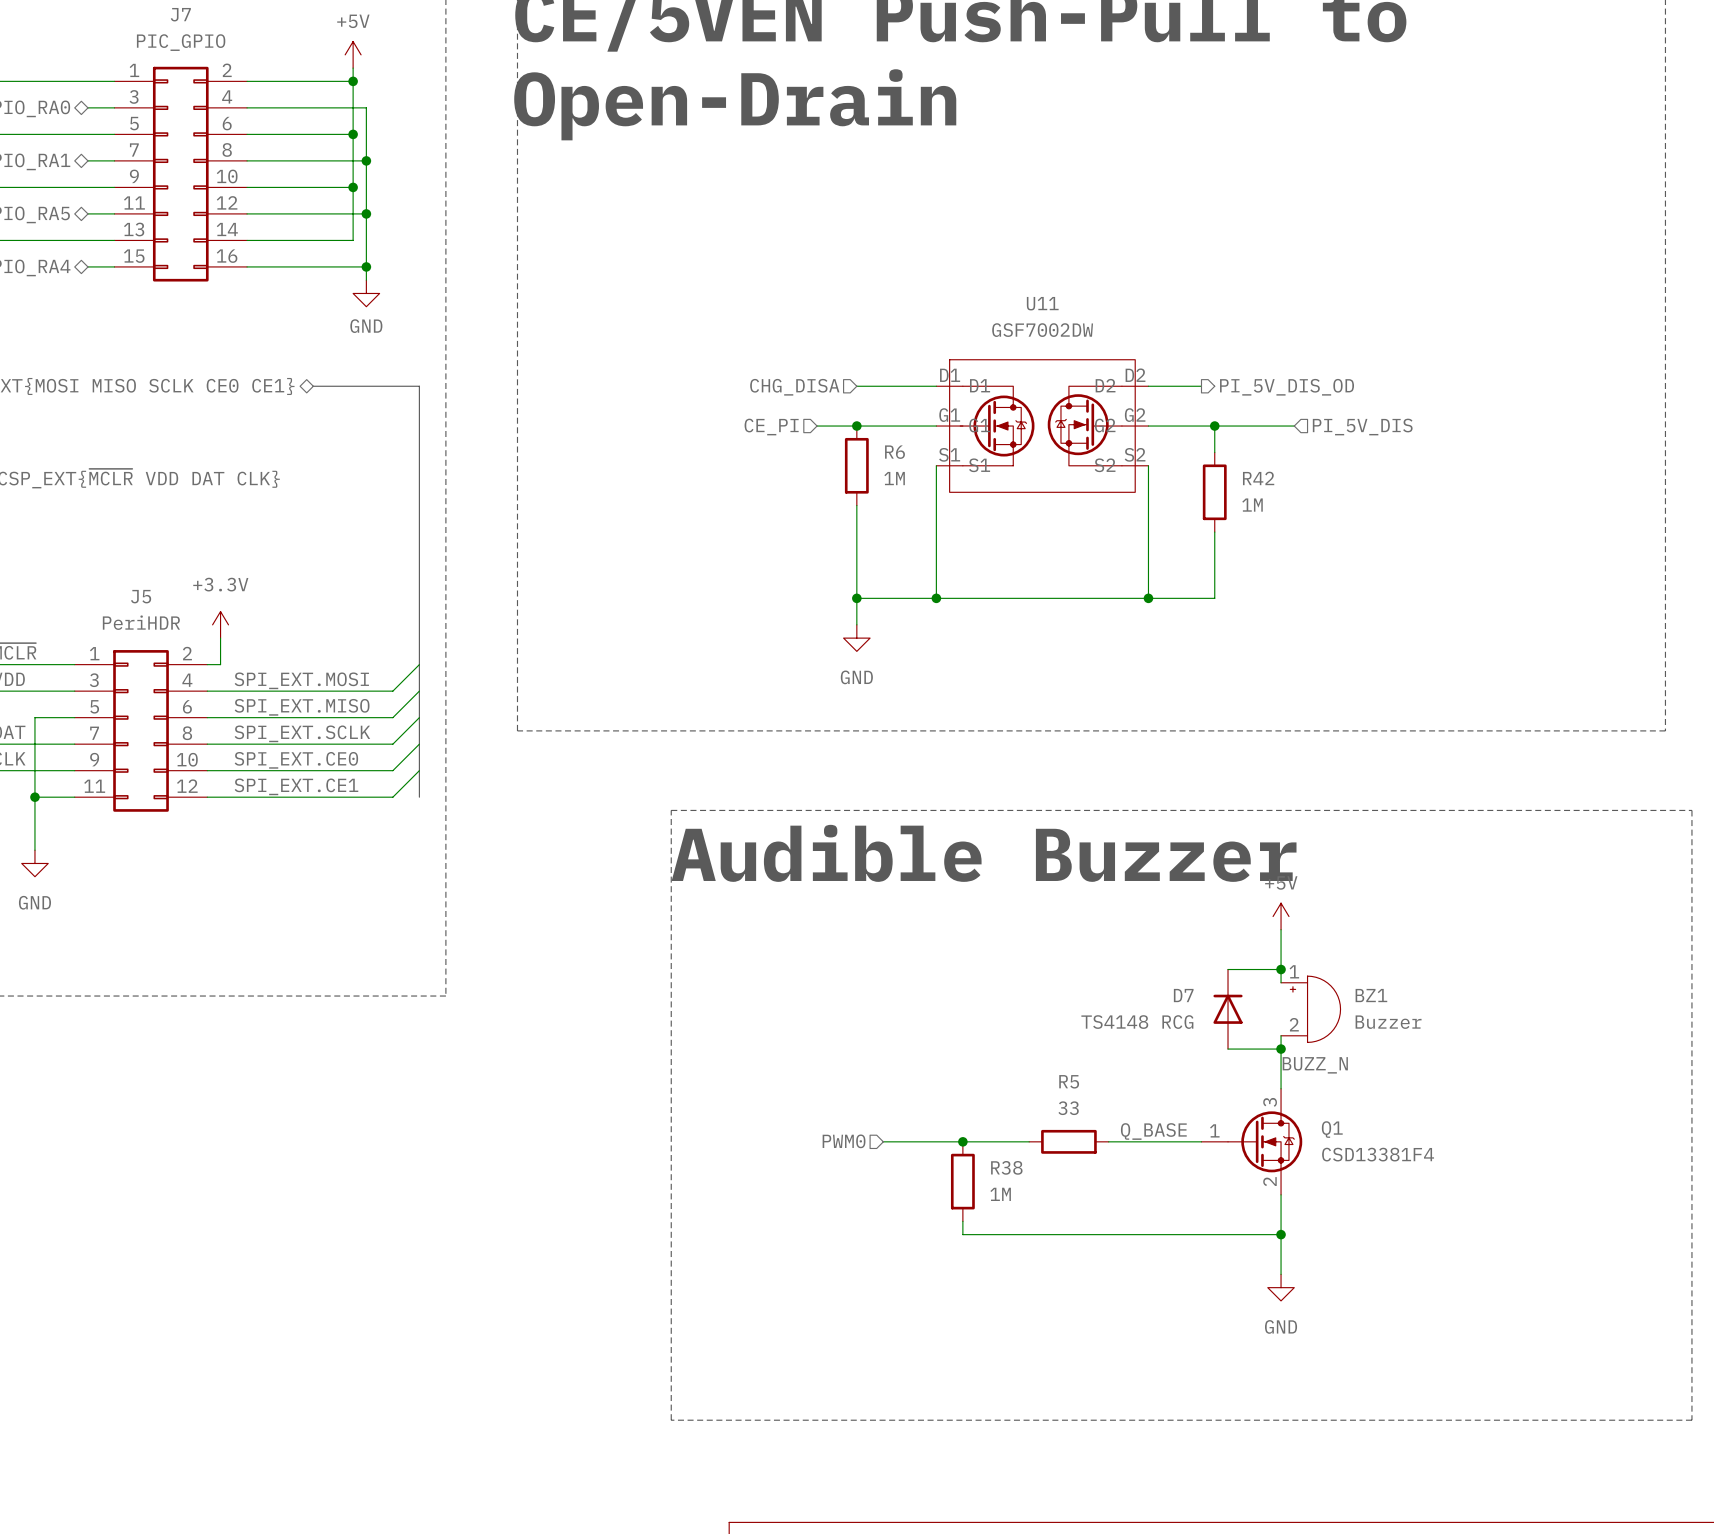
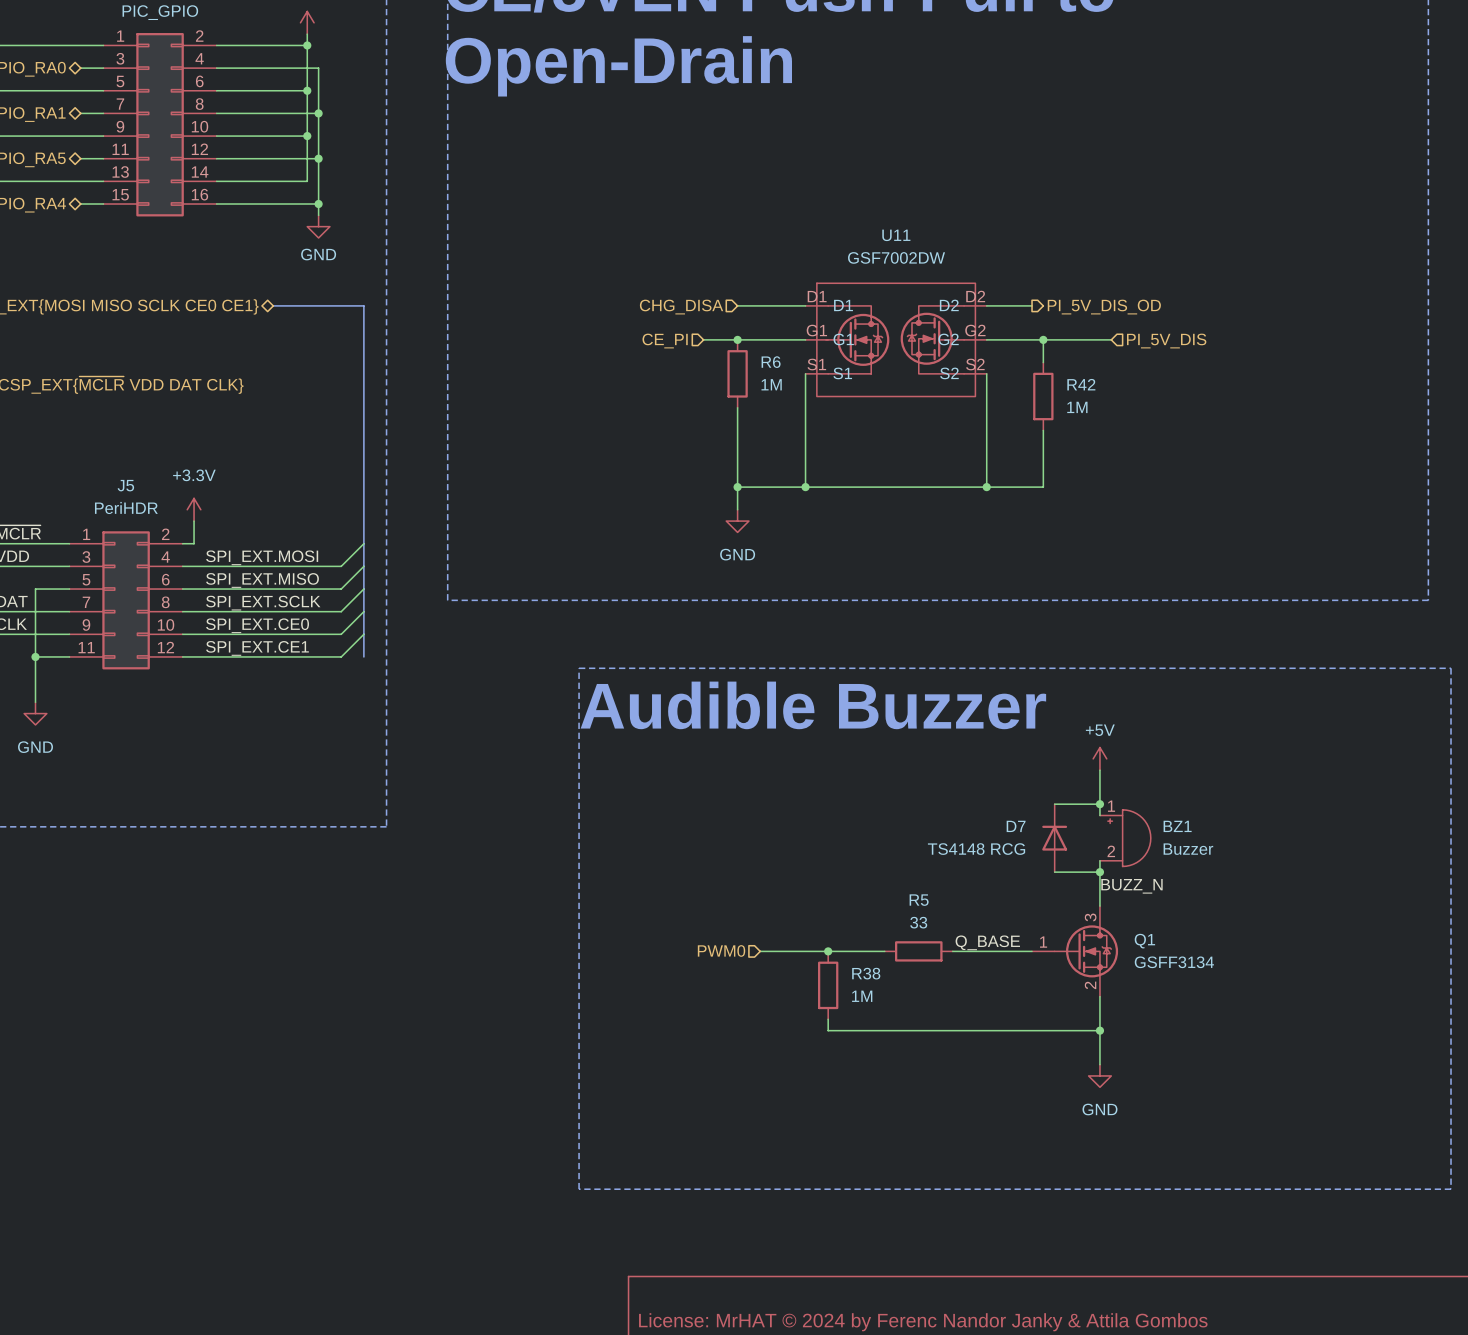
Q1 value: CSD13381F4 (1378, 1154) -> GSFF3134 (1174, 962)

